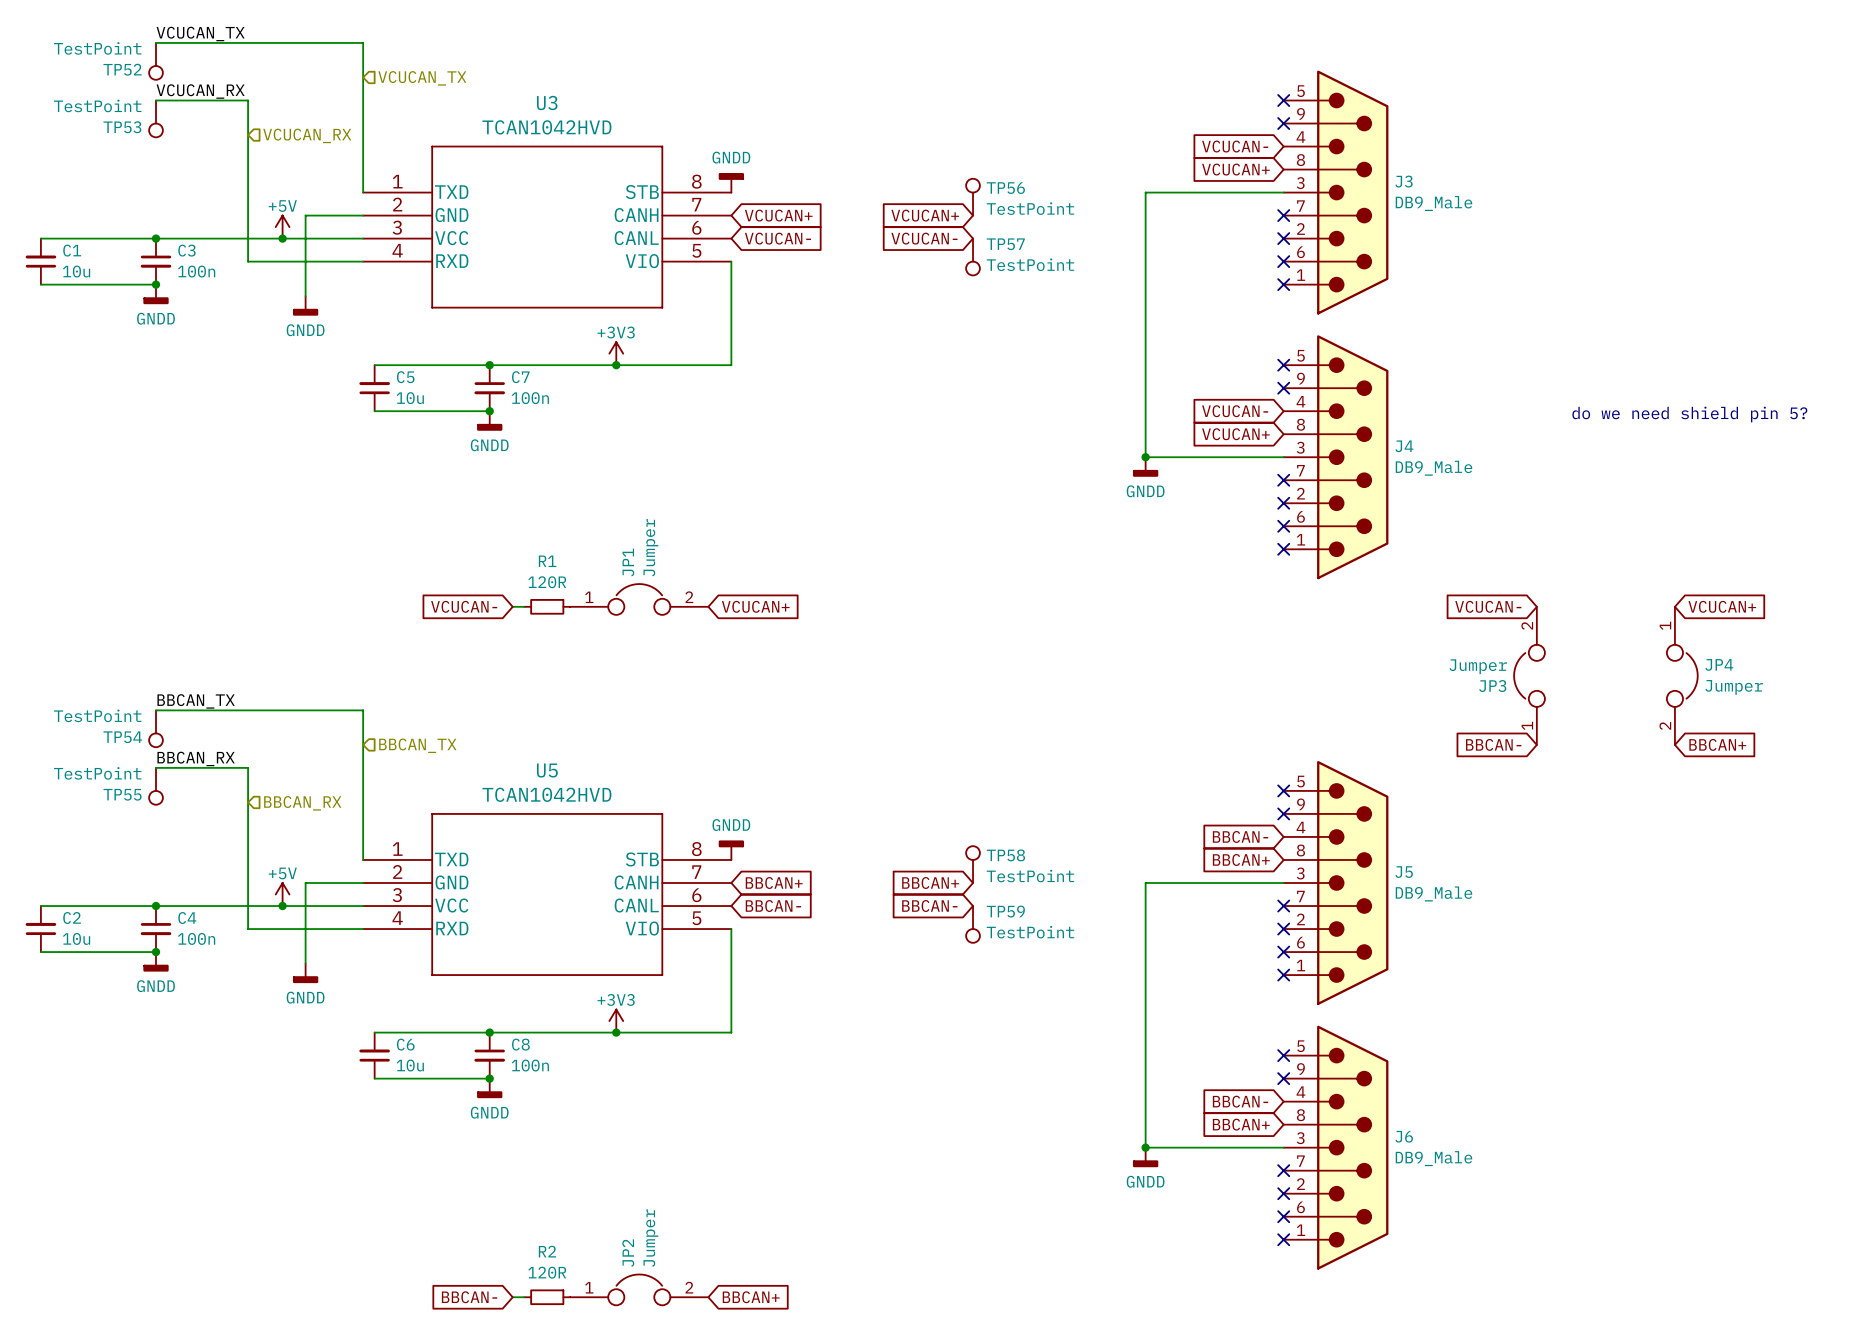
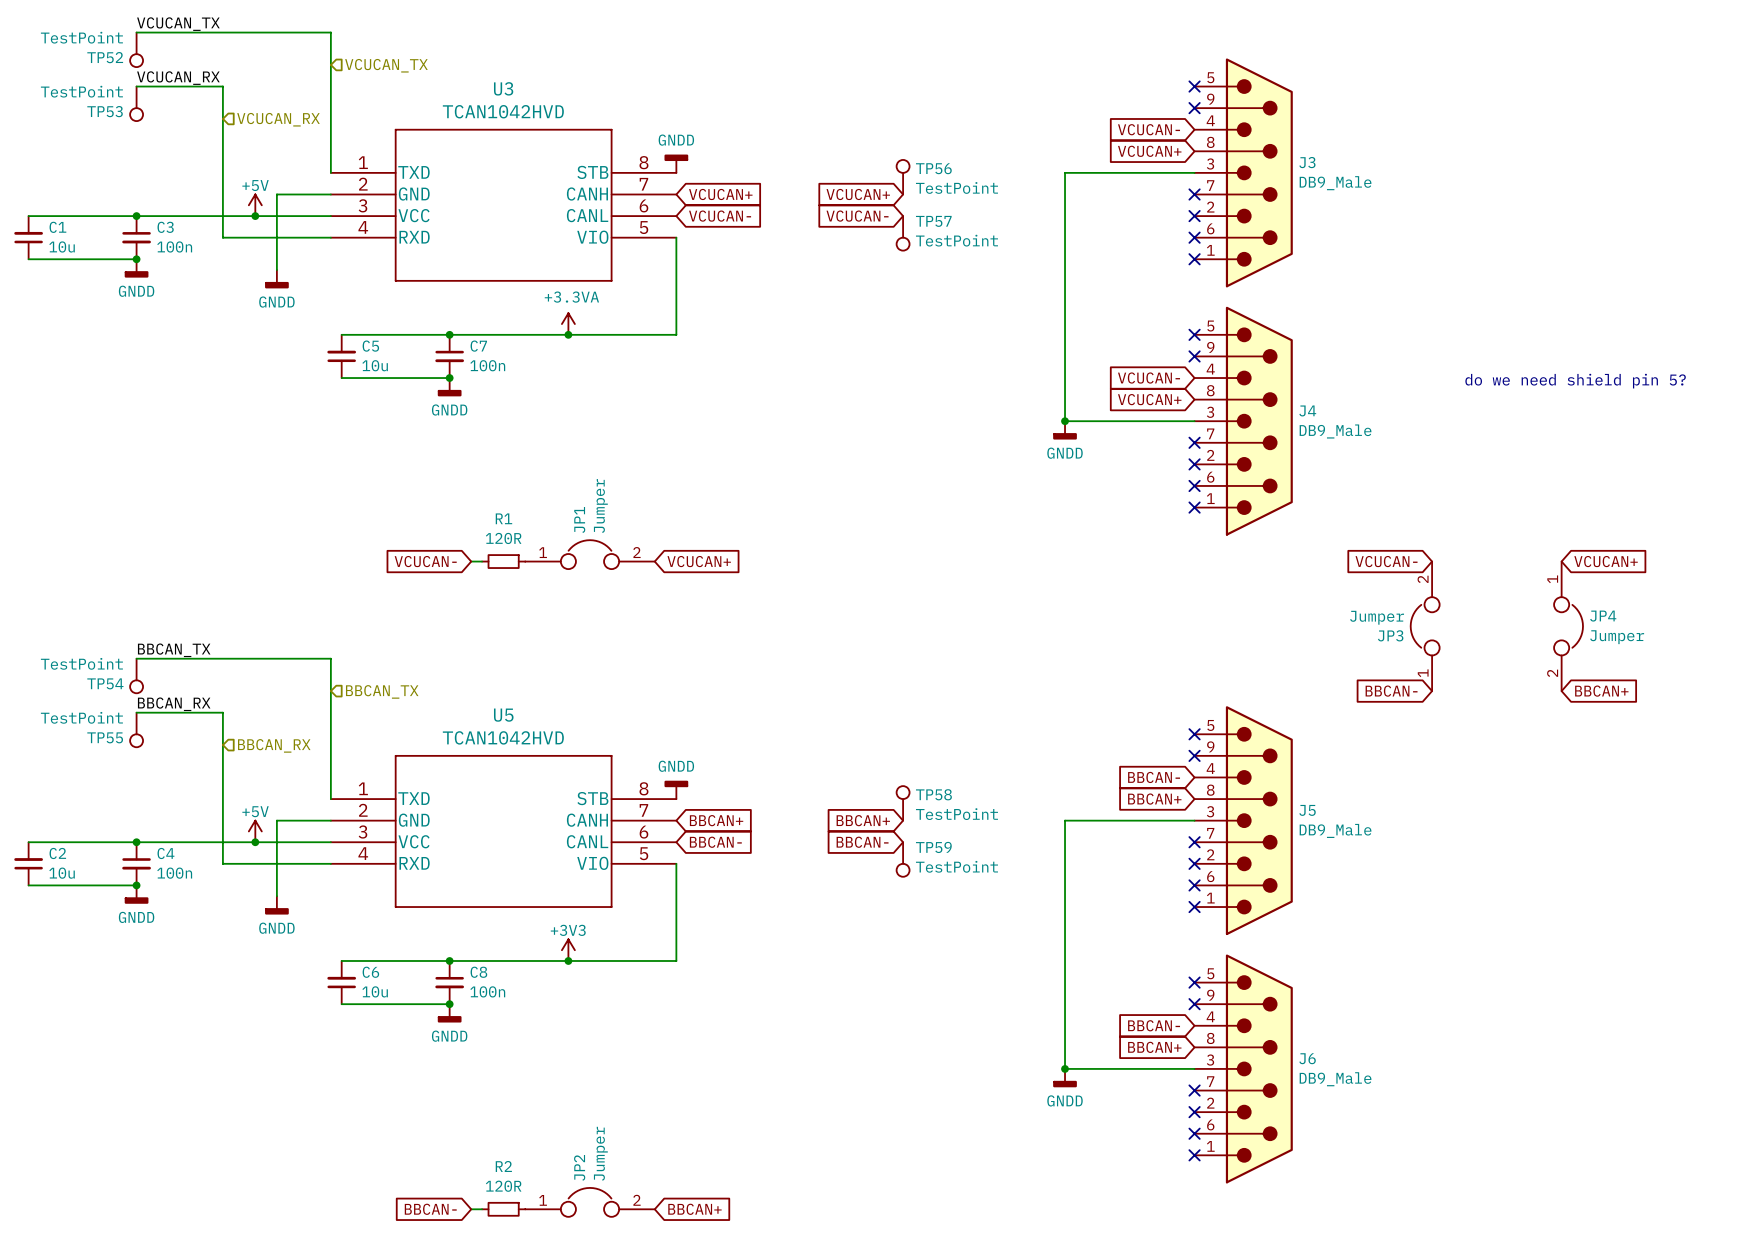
power symbol: +3V3 (616, 353) -> +3.3VA (568, 324)

